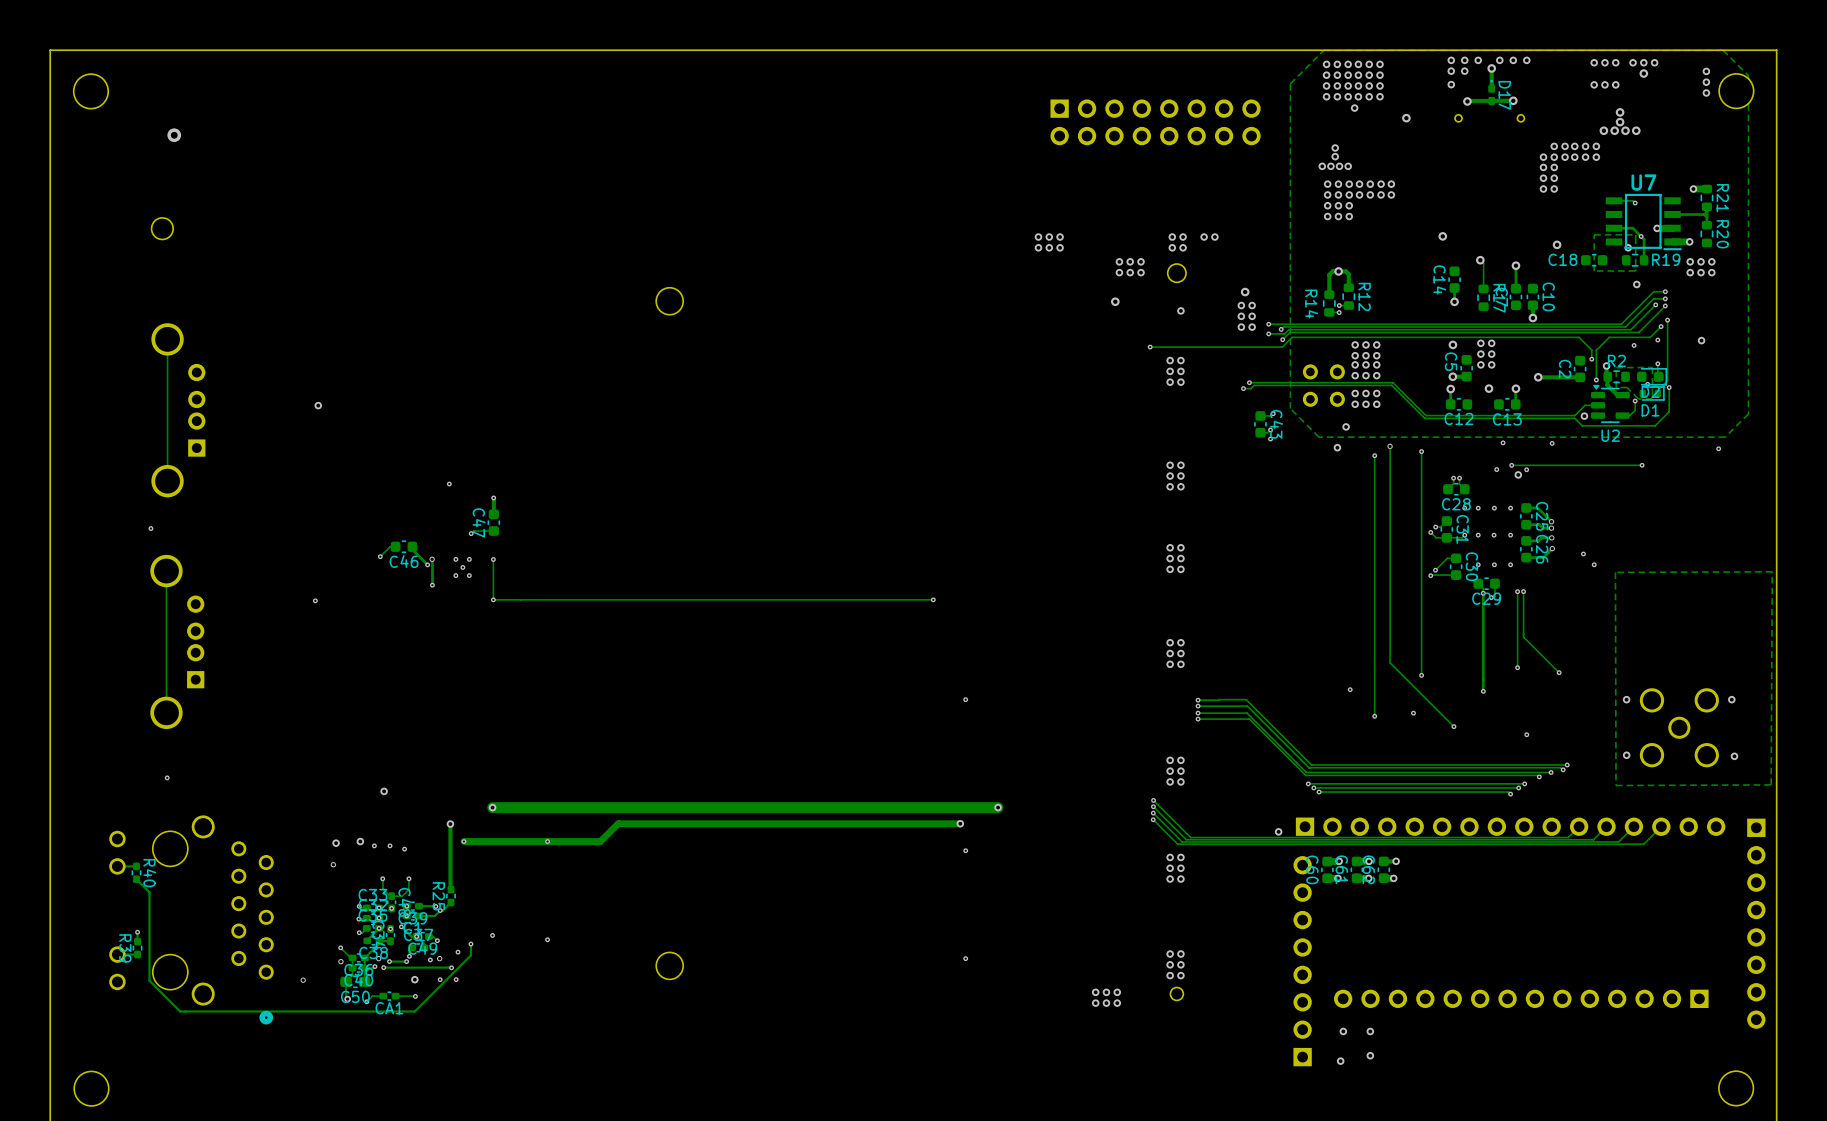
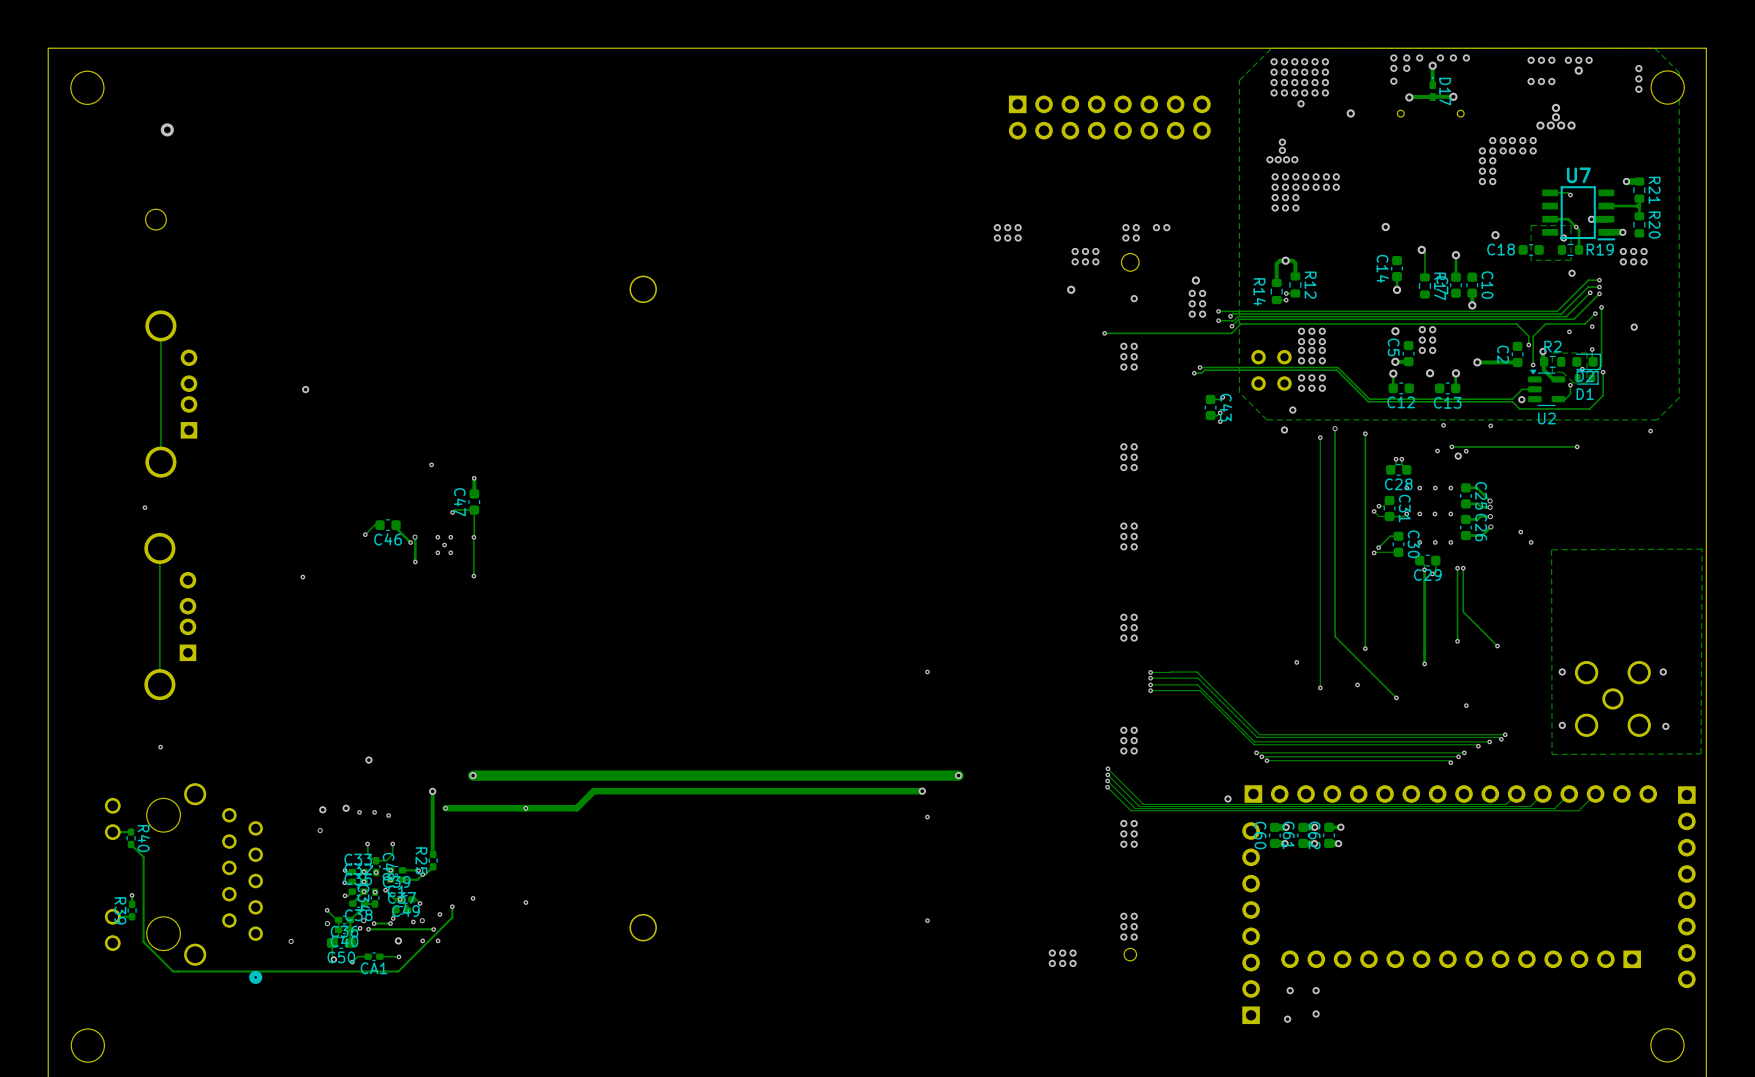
track: none -> (474, 509) (474, 536)
track: (933, 599) (493, 599) -> none
via: (933, 599) -> none

